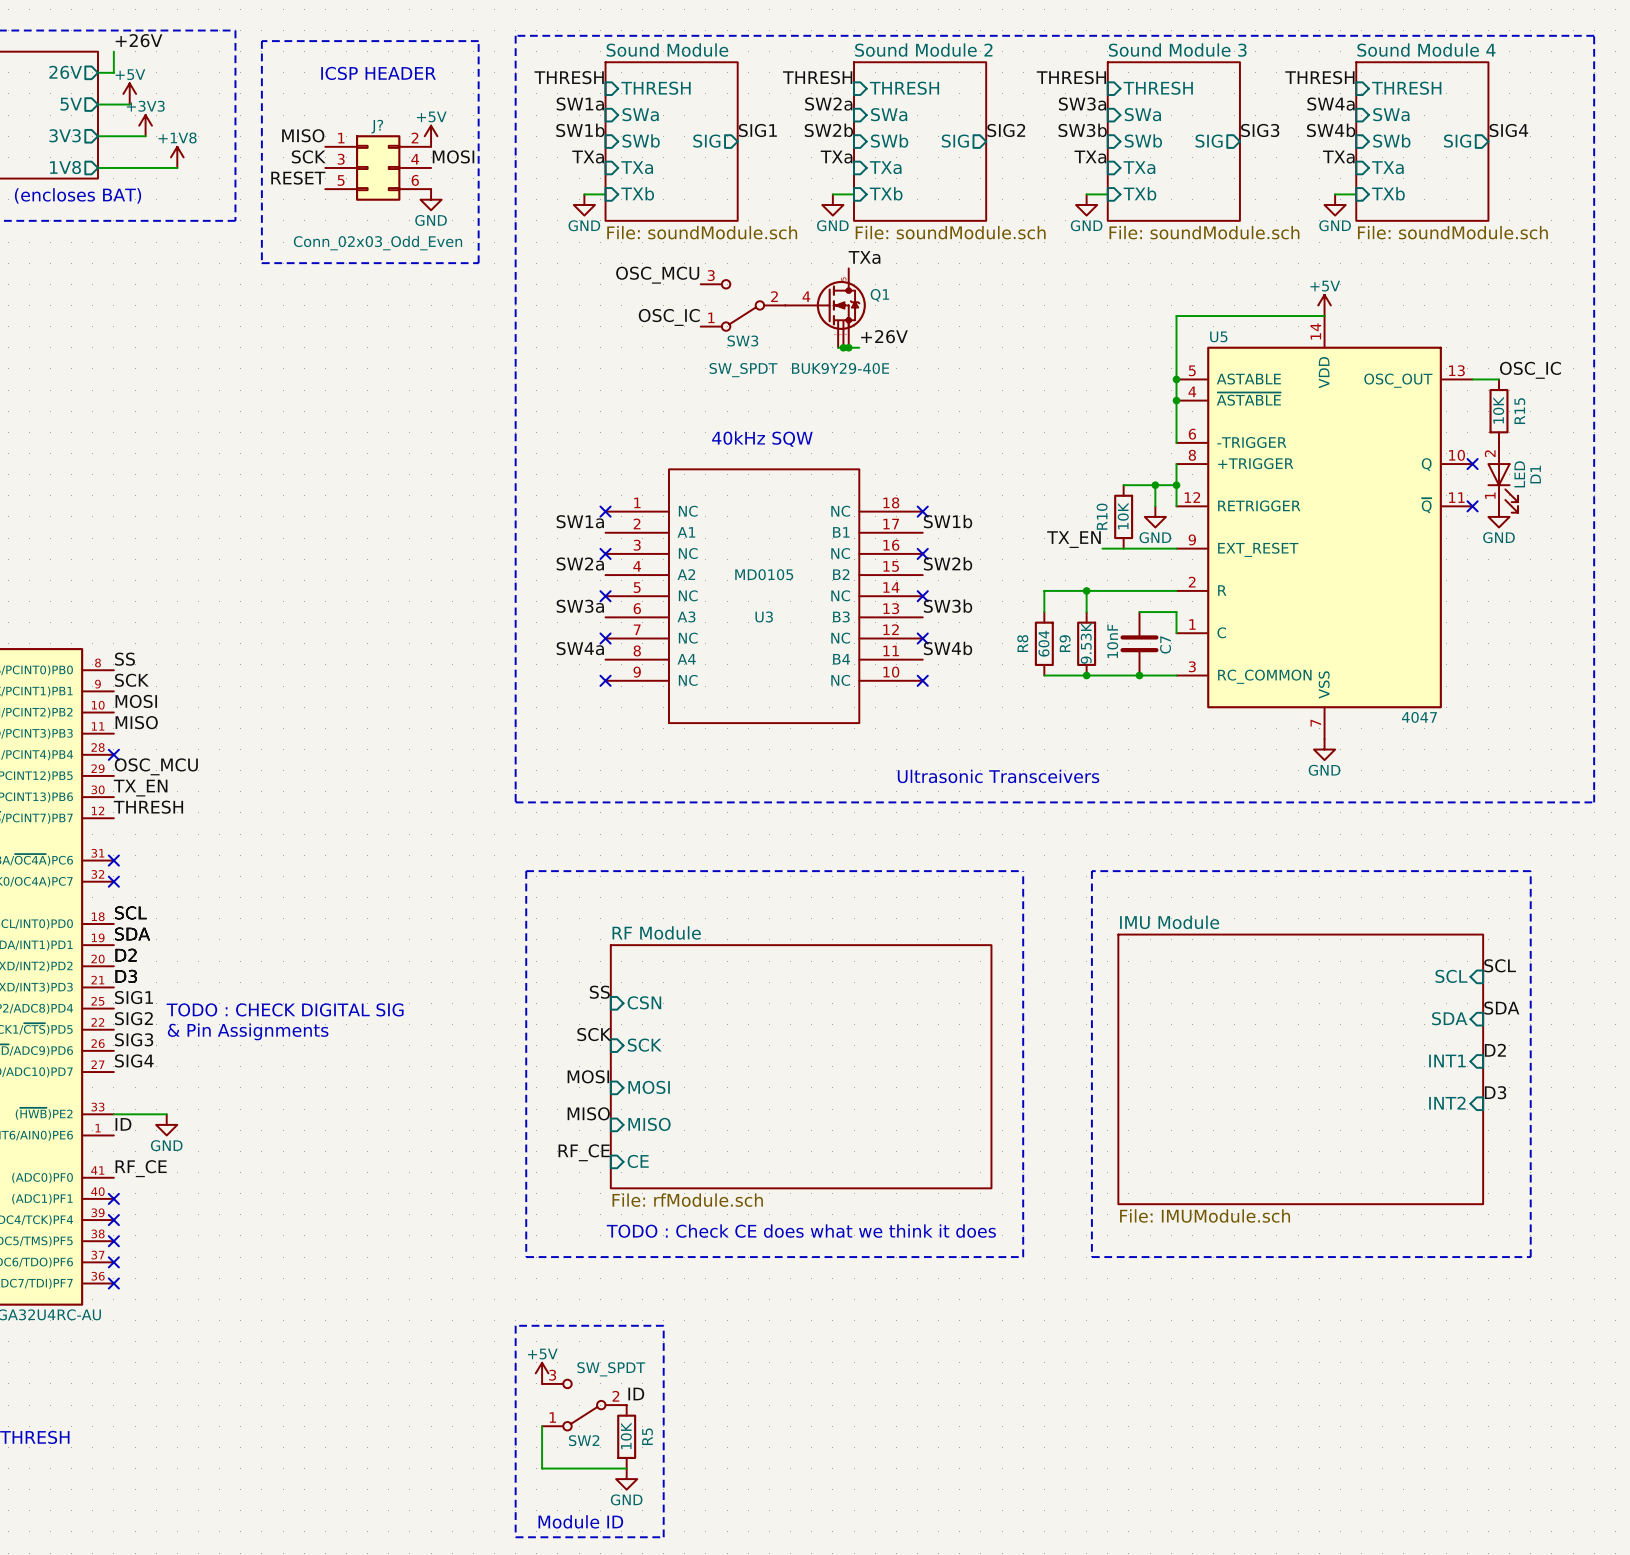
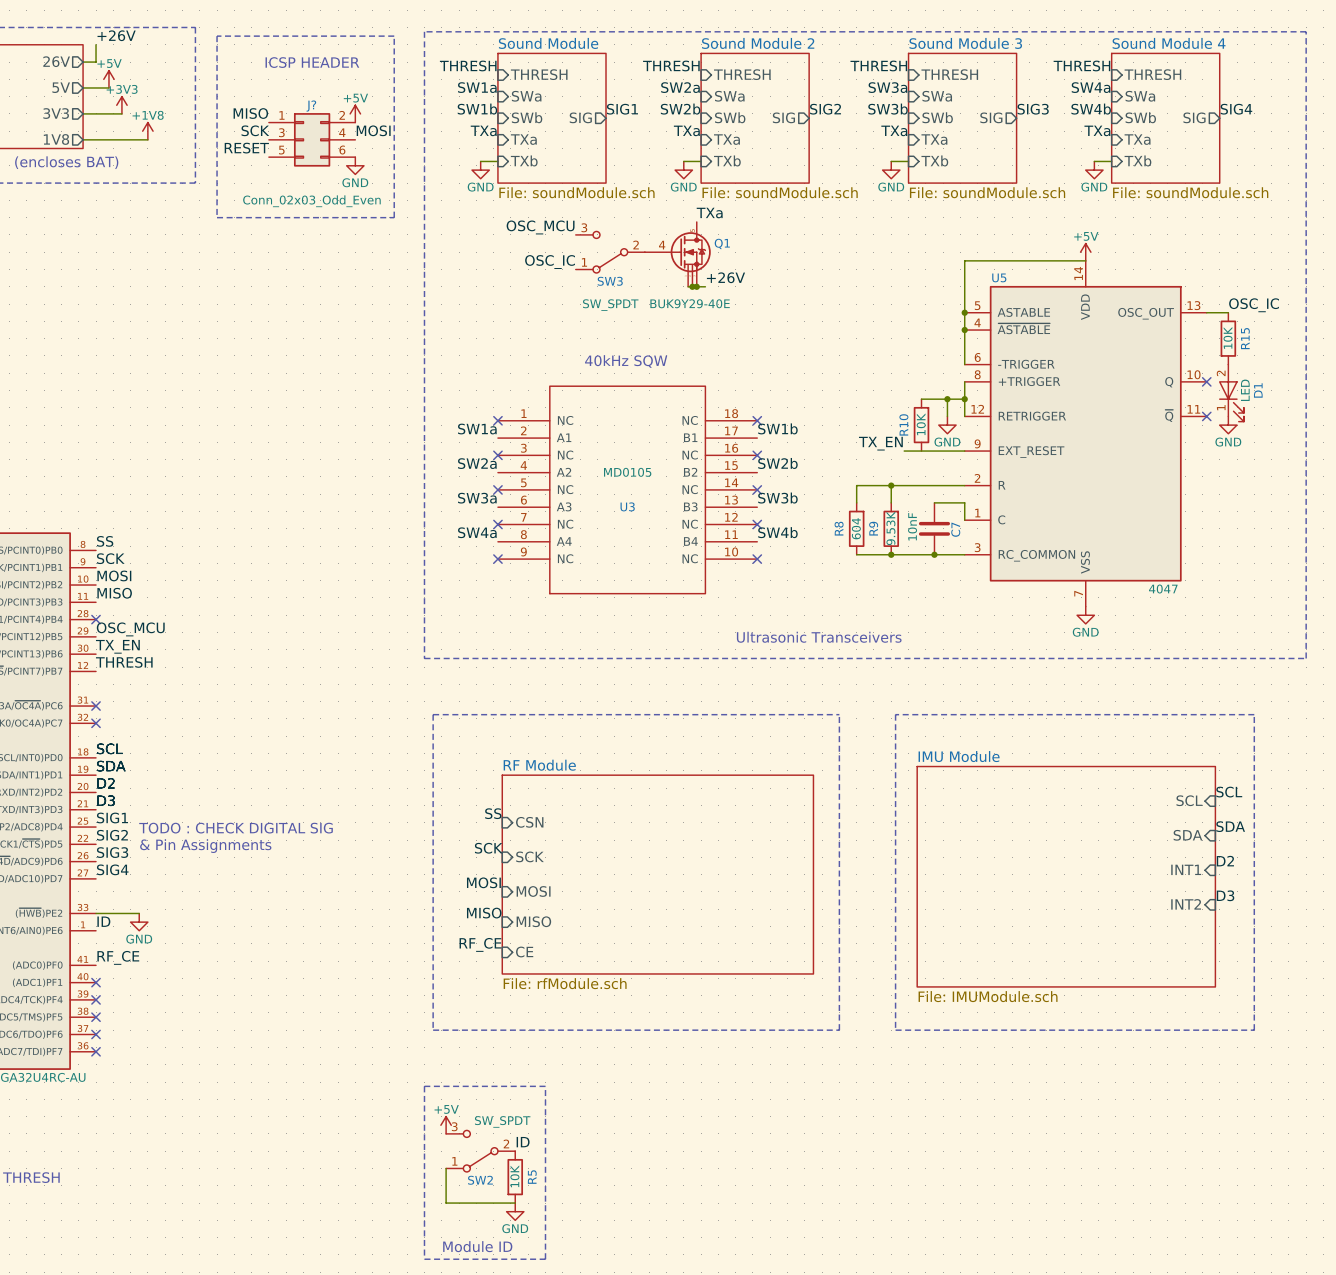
text: TODO : Check CE does what we think it does (801, 1231) -> none

